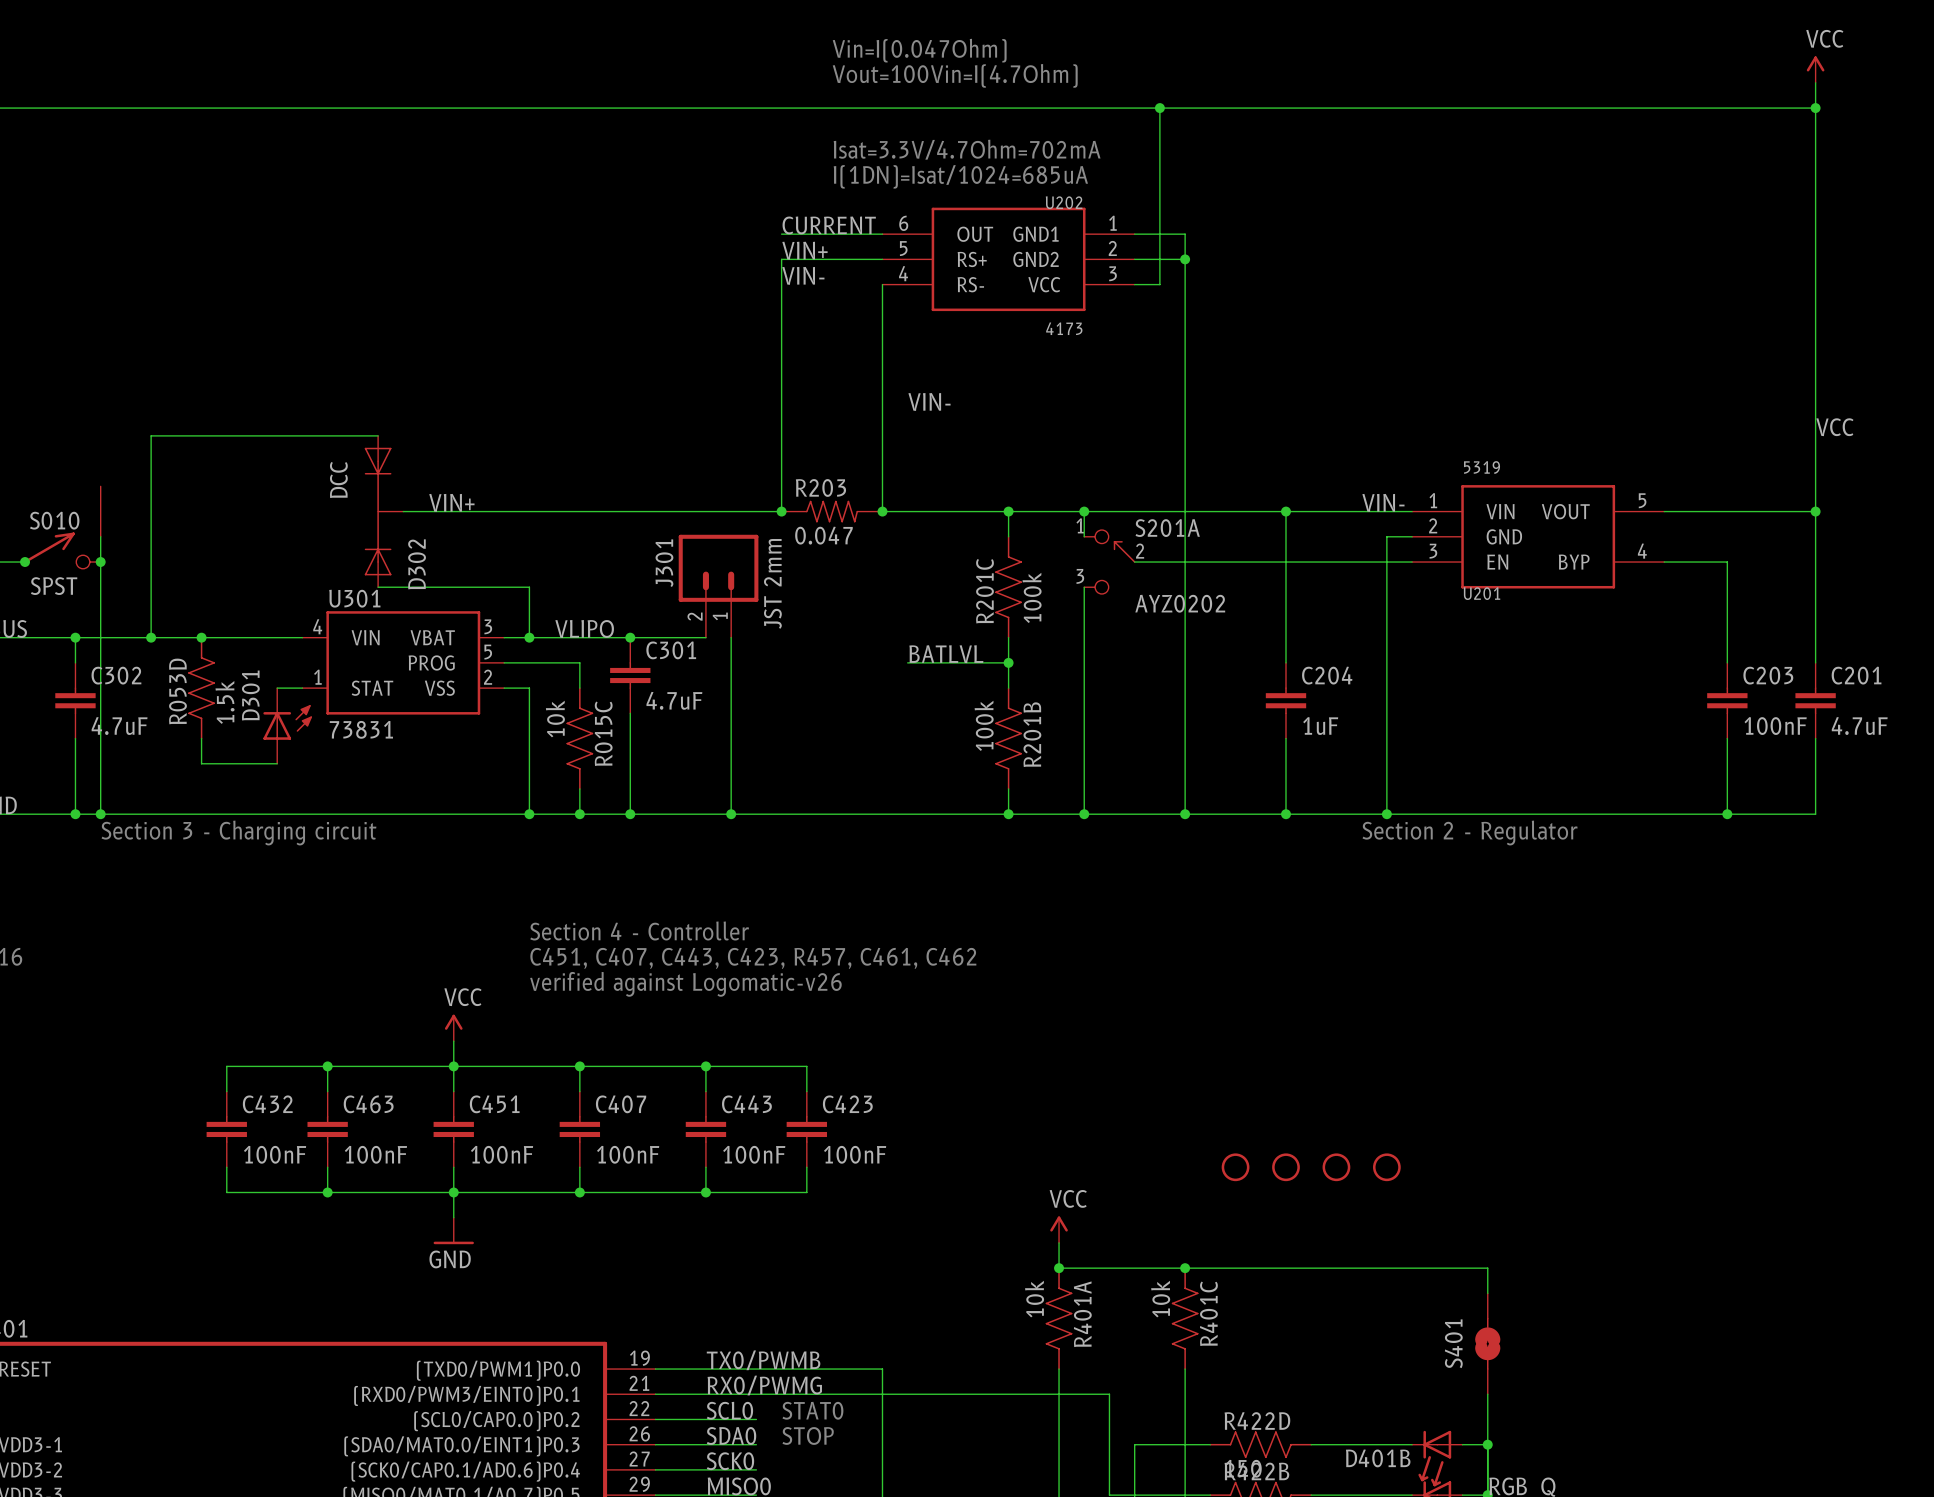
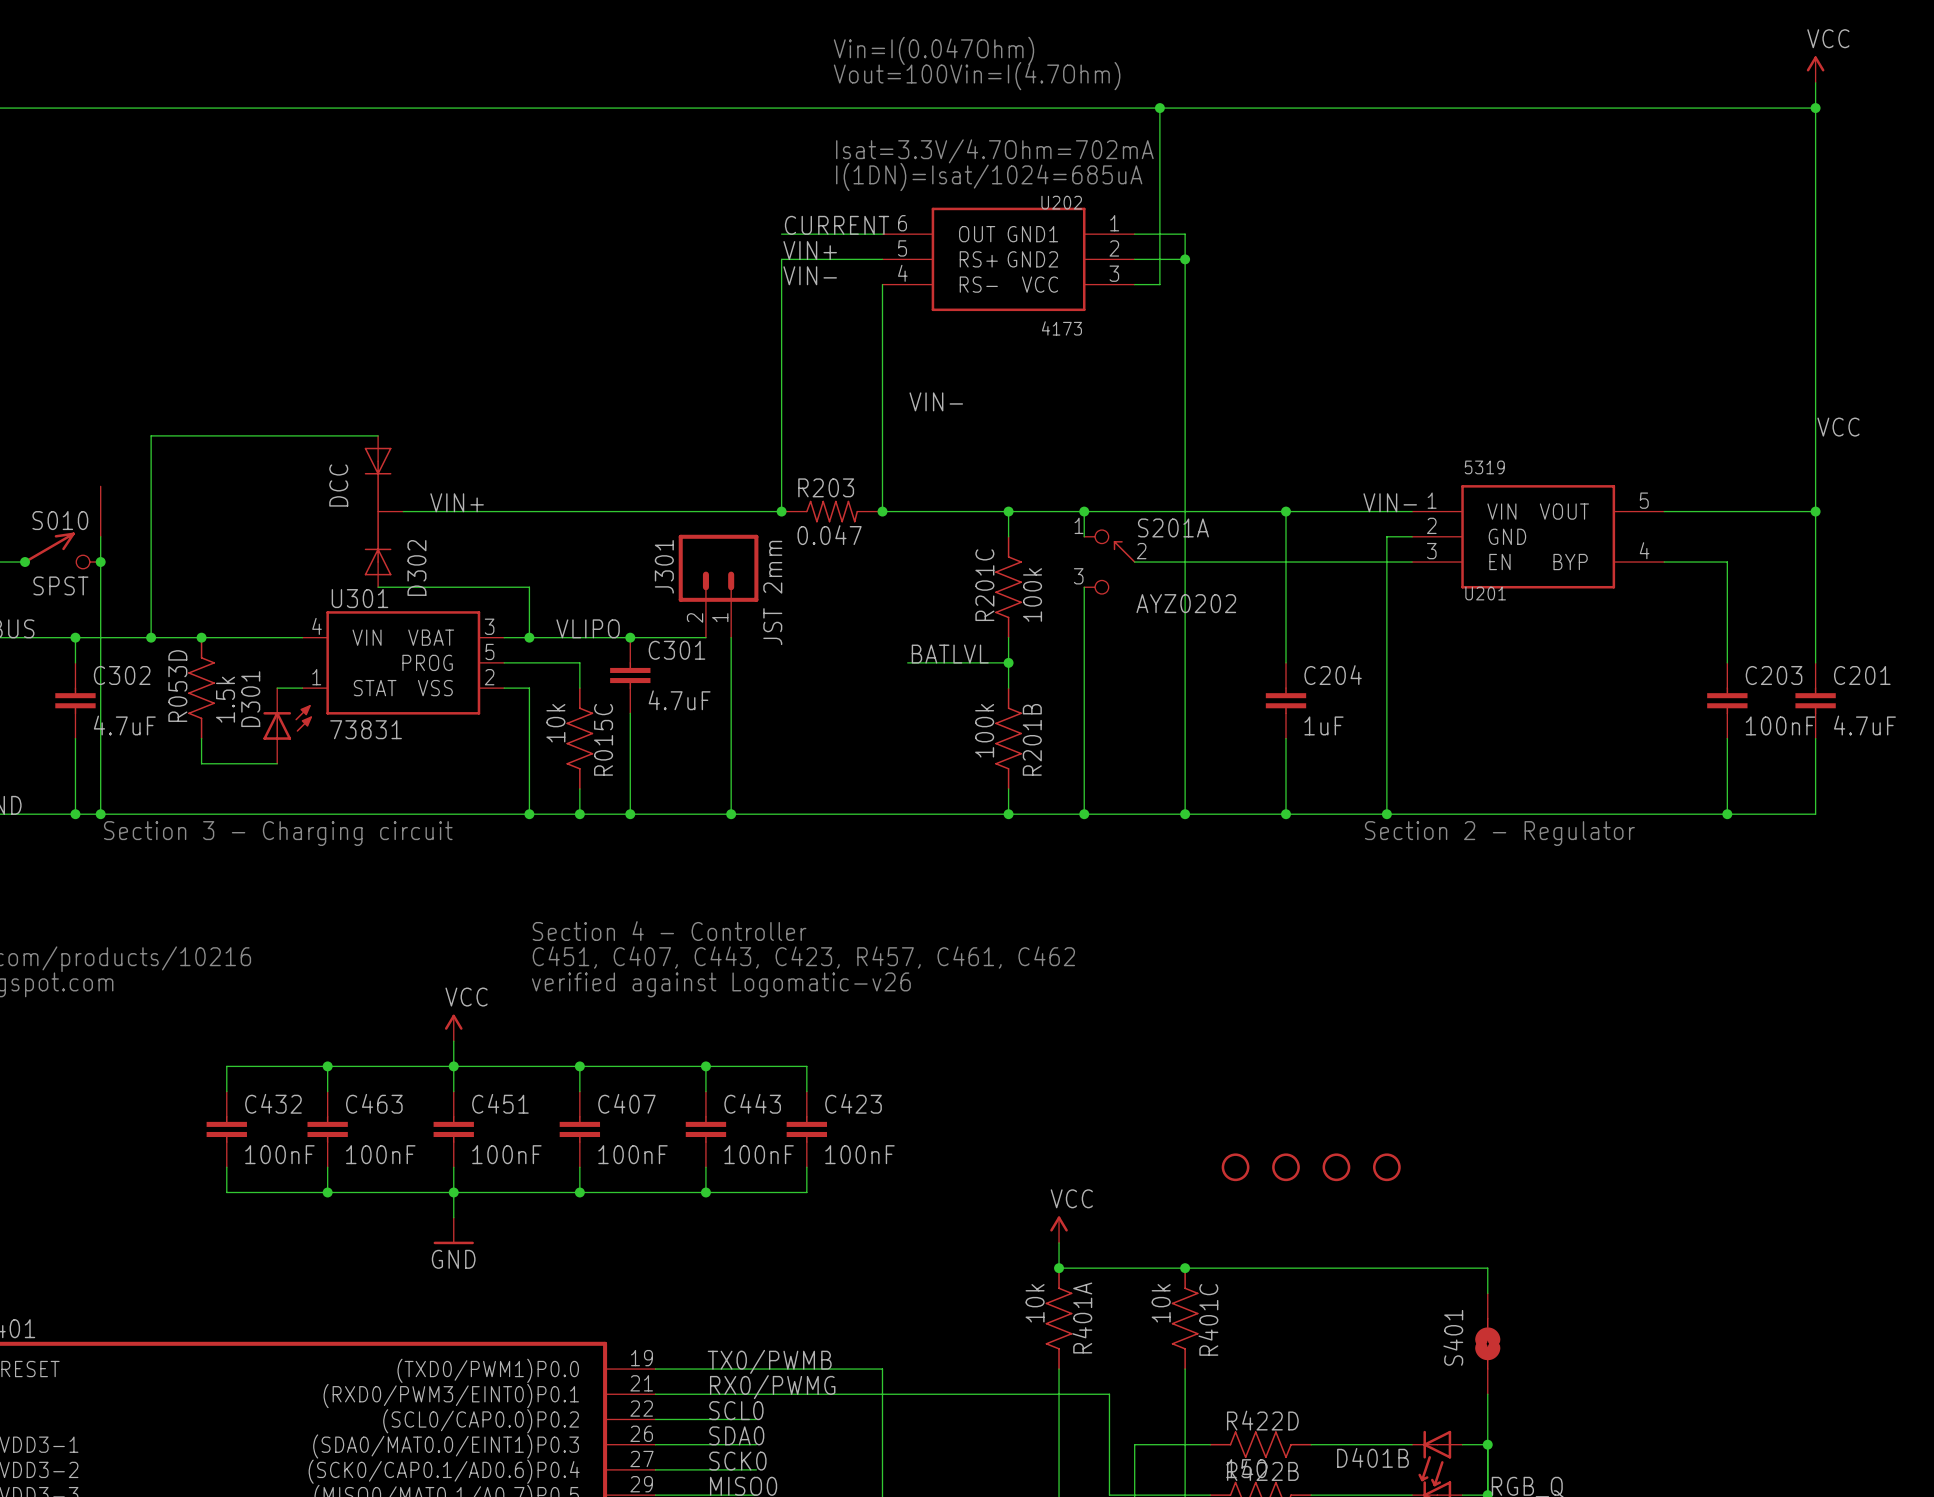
text: STAT0 (812, 1410) -> none
text: STOP (808, 1435) -> none

